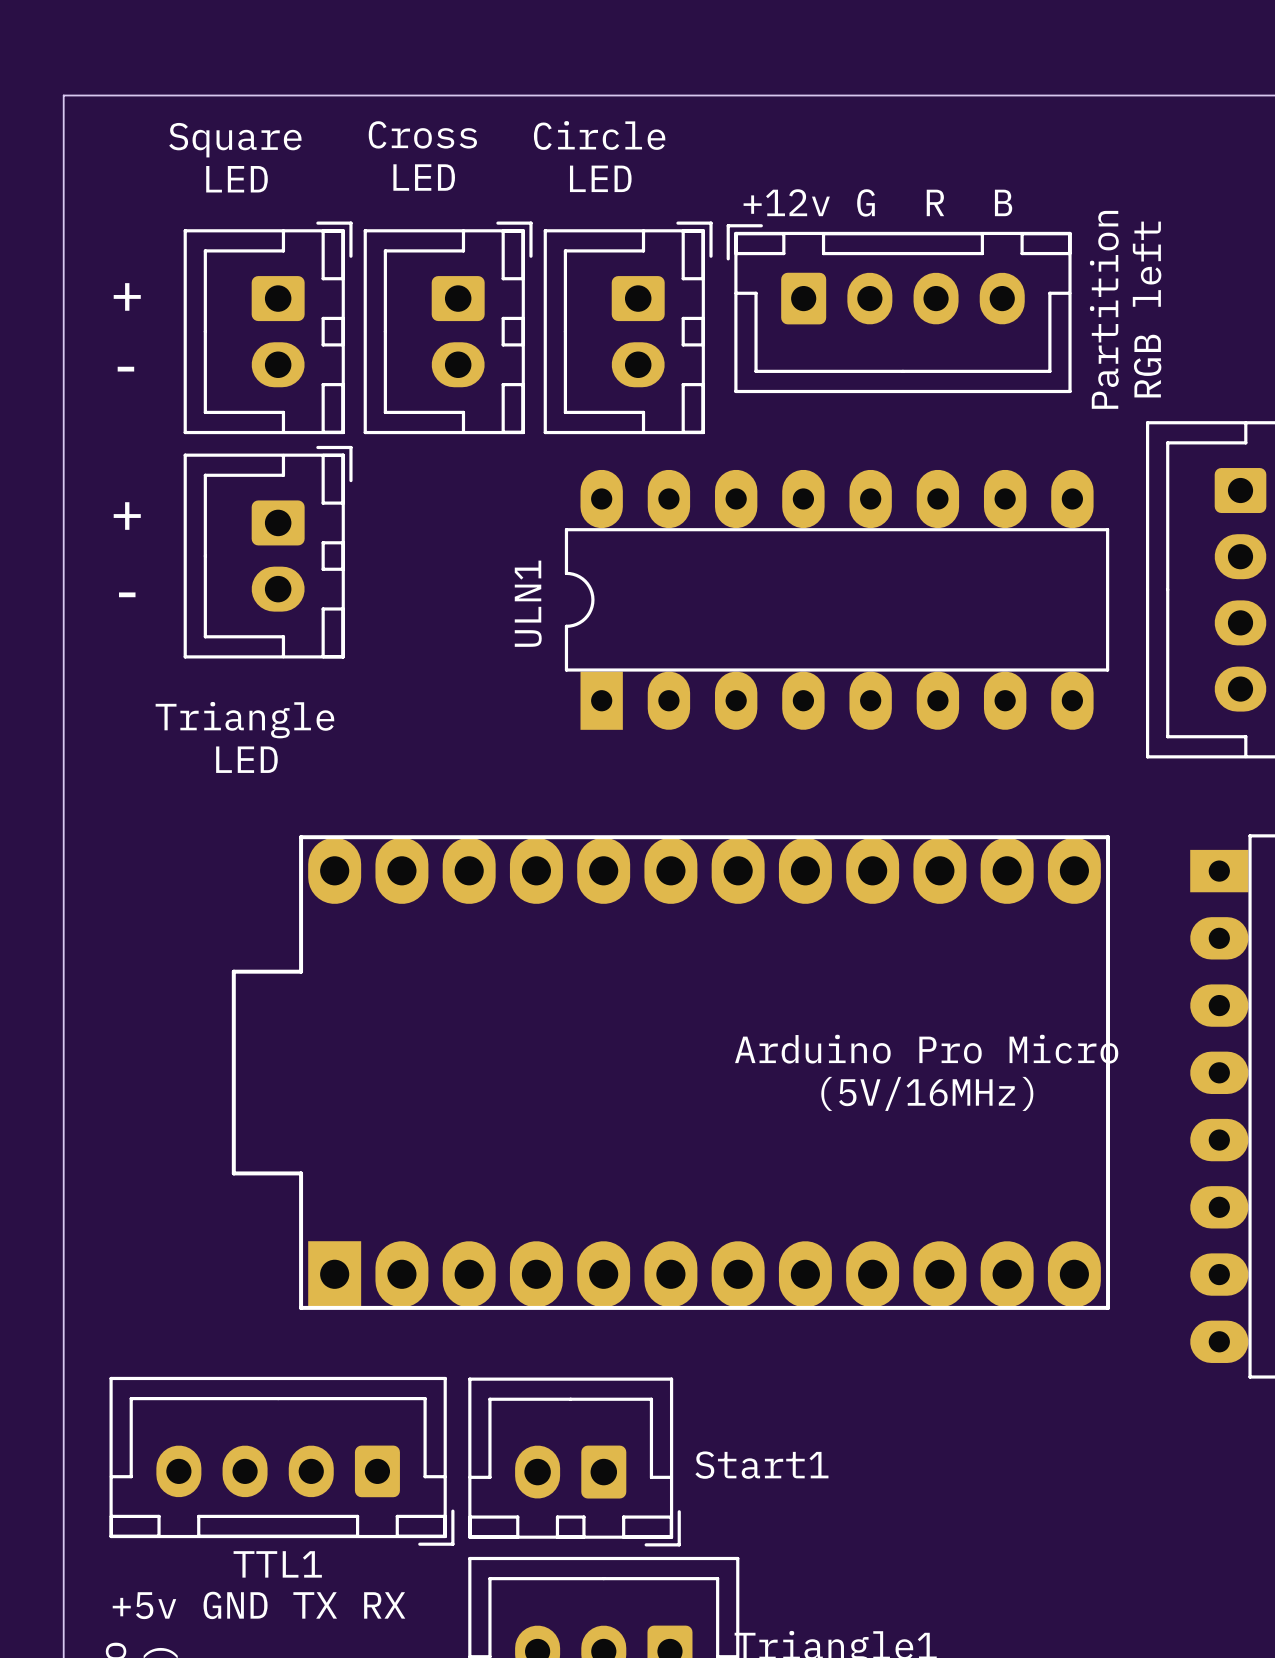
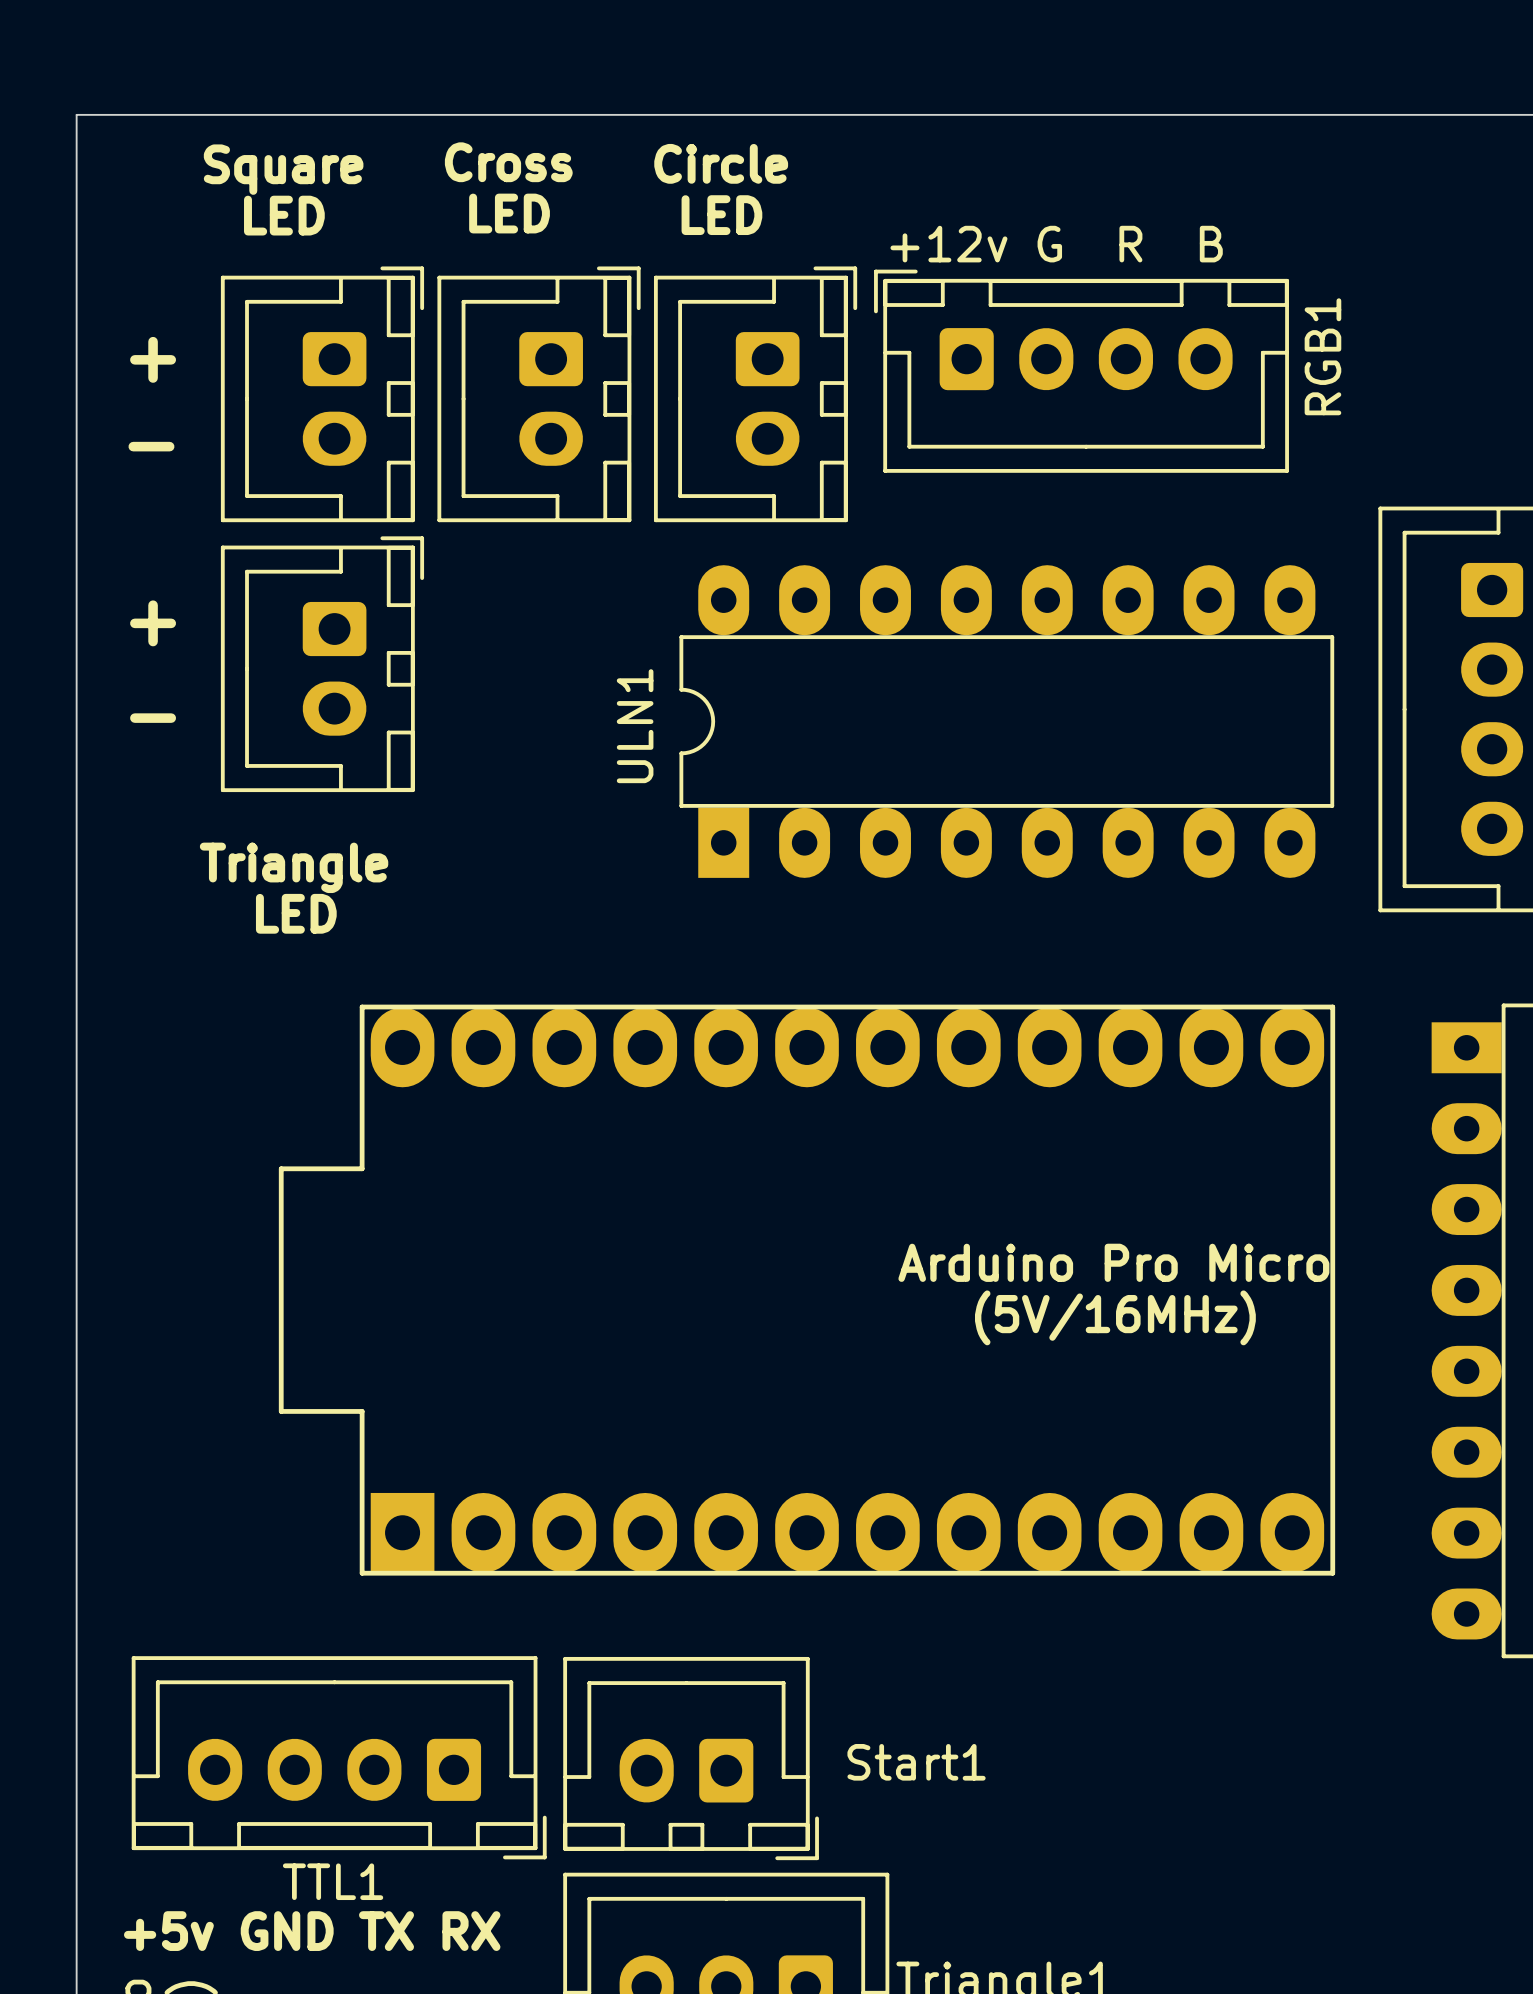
RGB1 name: none -> RGB1 (1322, 356)
text: Partition (1104, 309) -> none
text: RGB left (1147, 309) -> none

